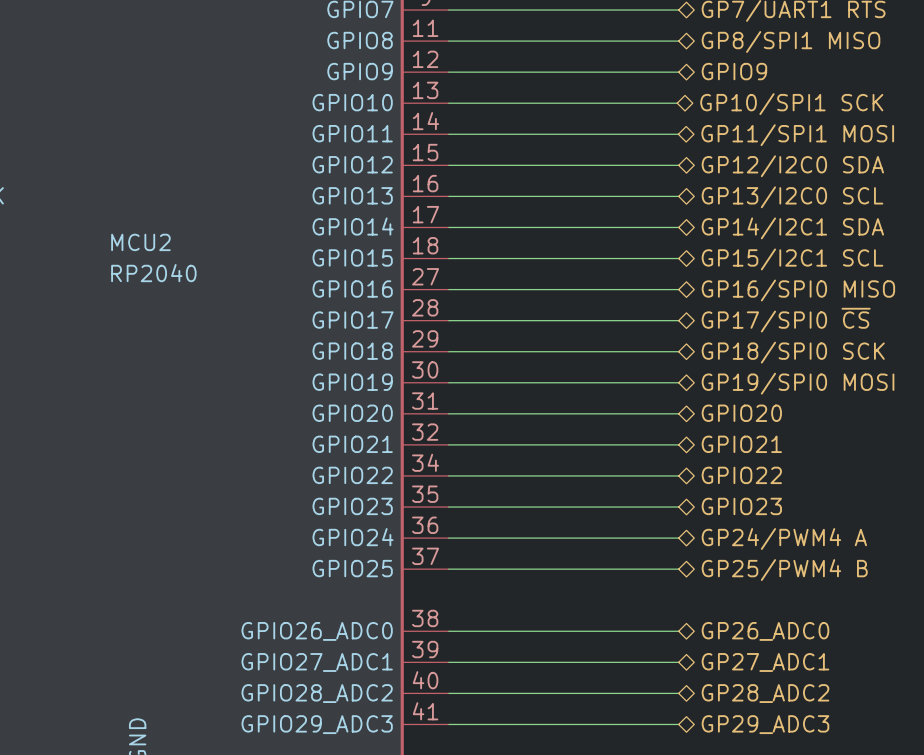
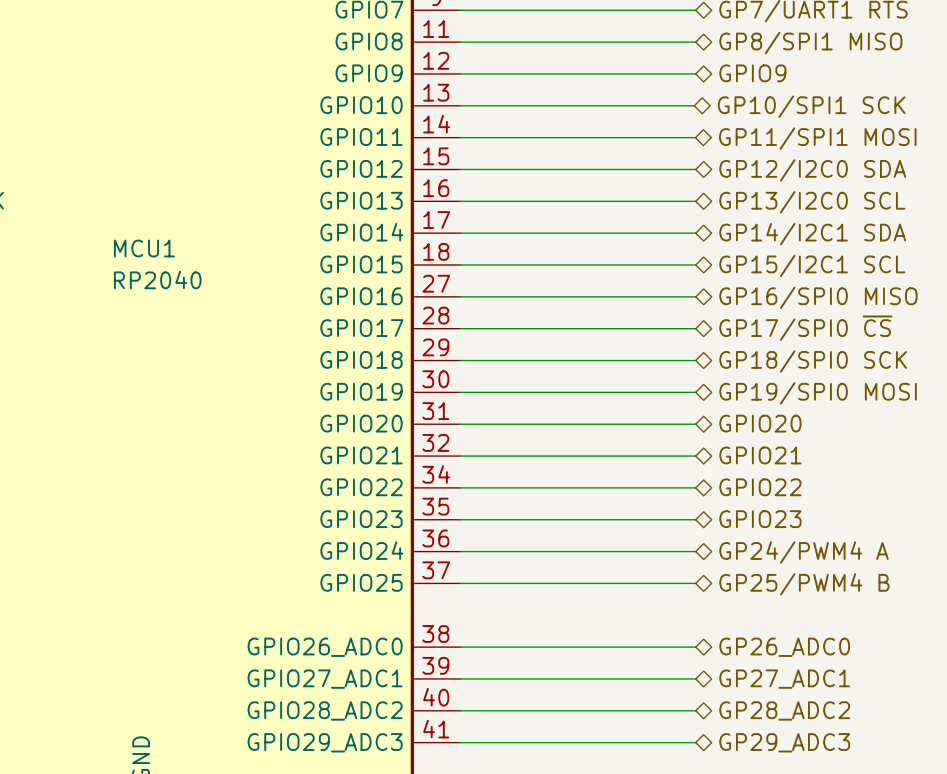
MCU2 name: MCU2 (140, 242) -> MCU1 (144, 248)

